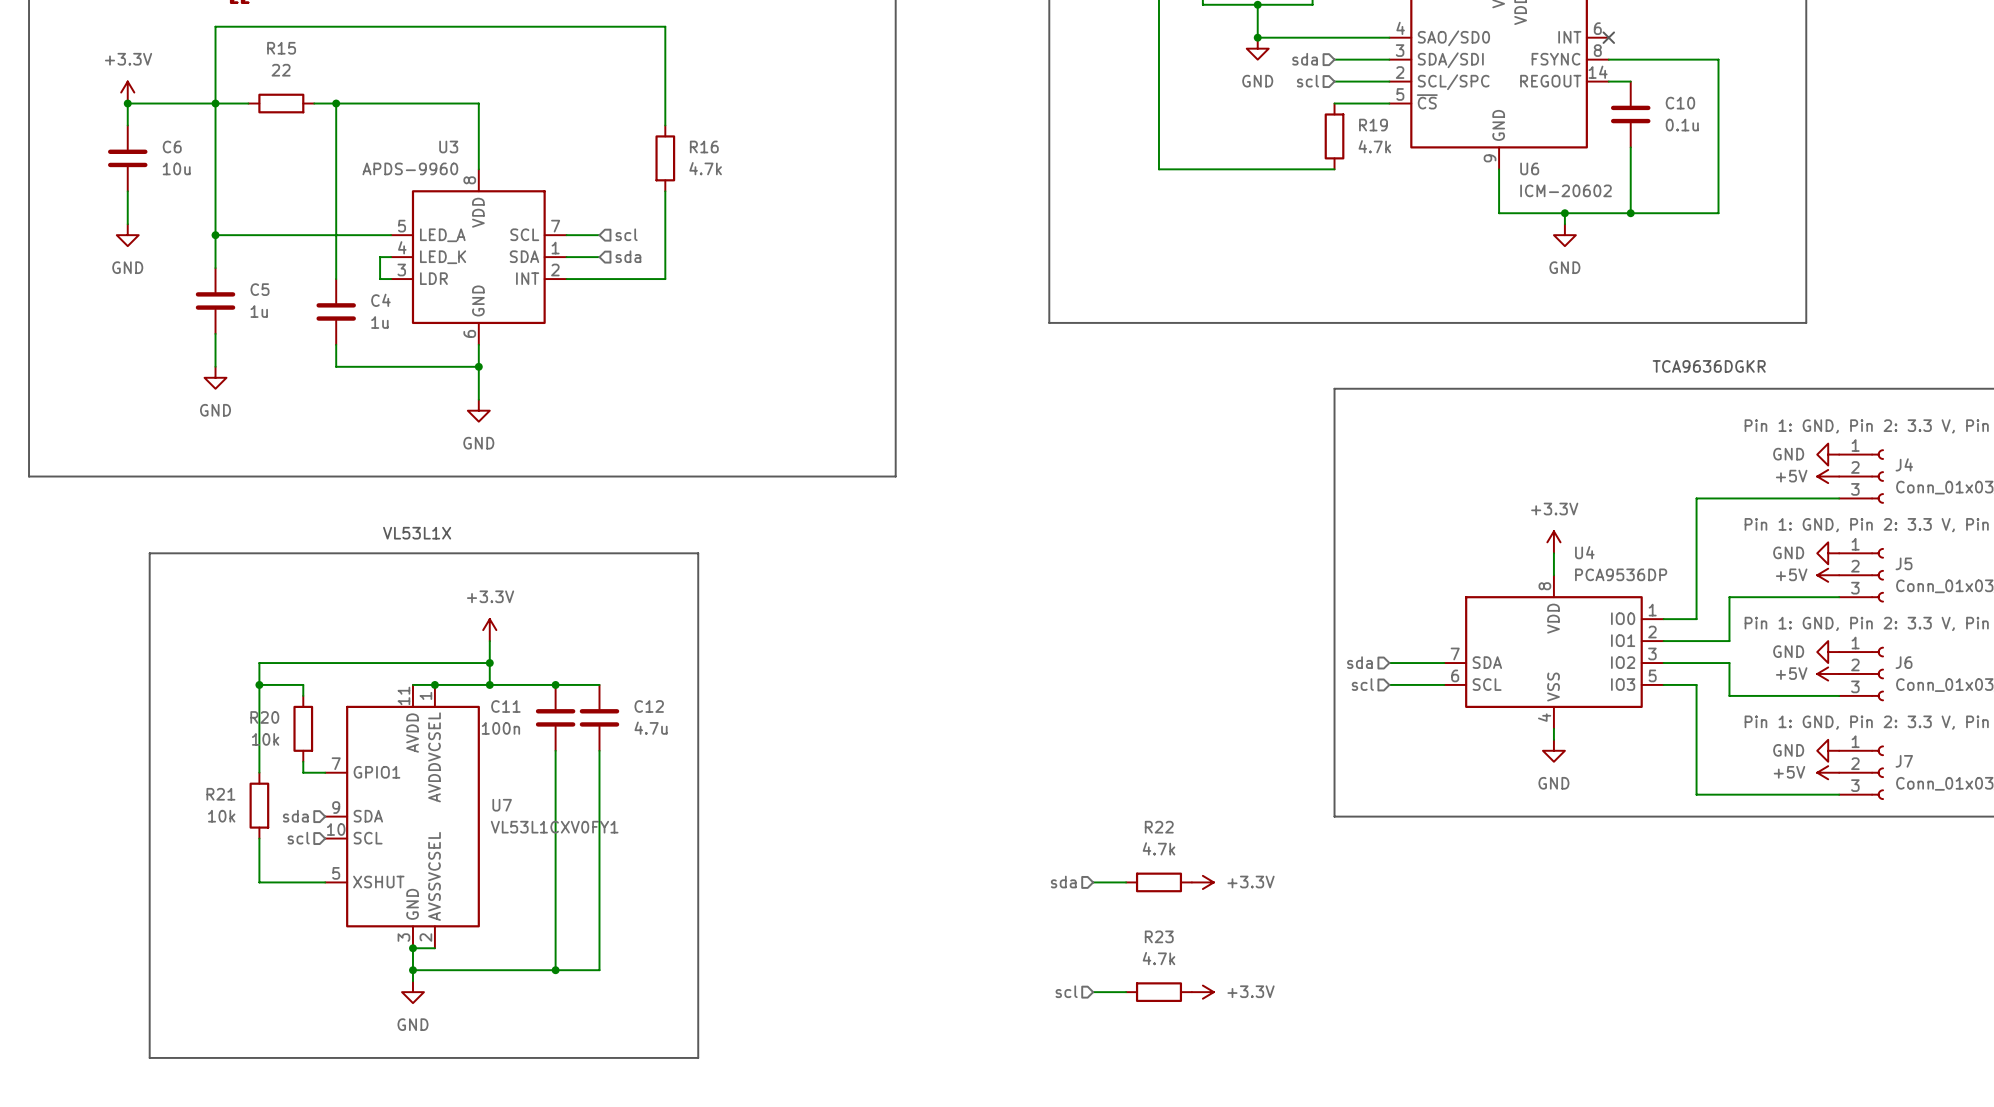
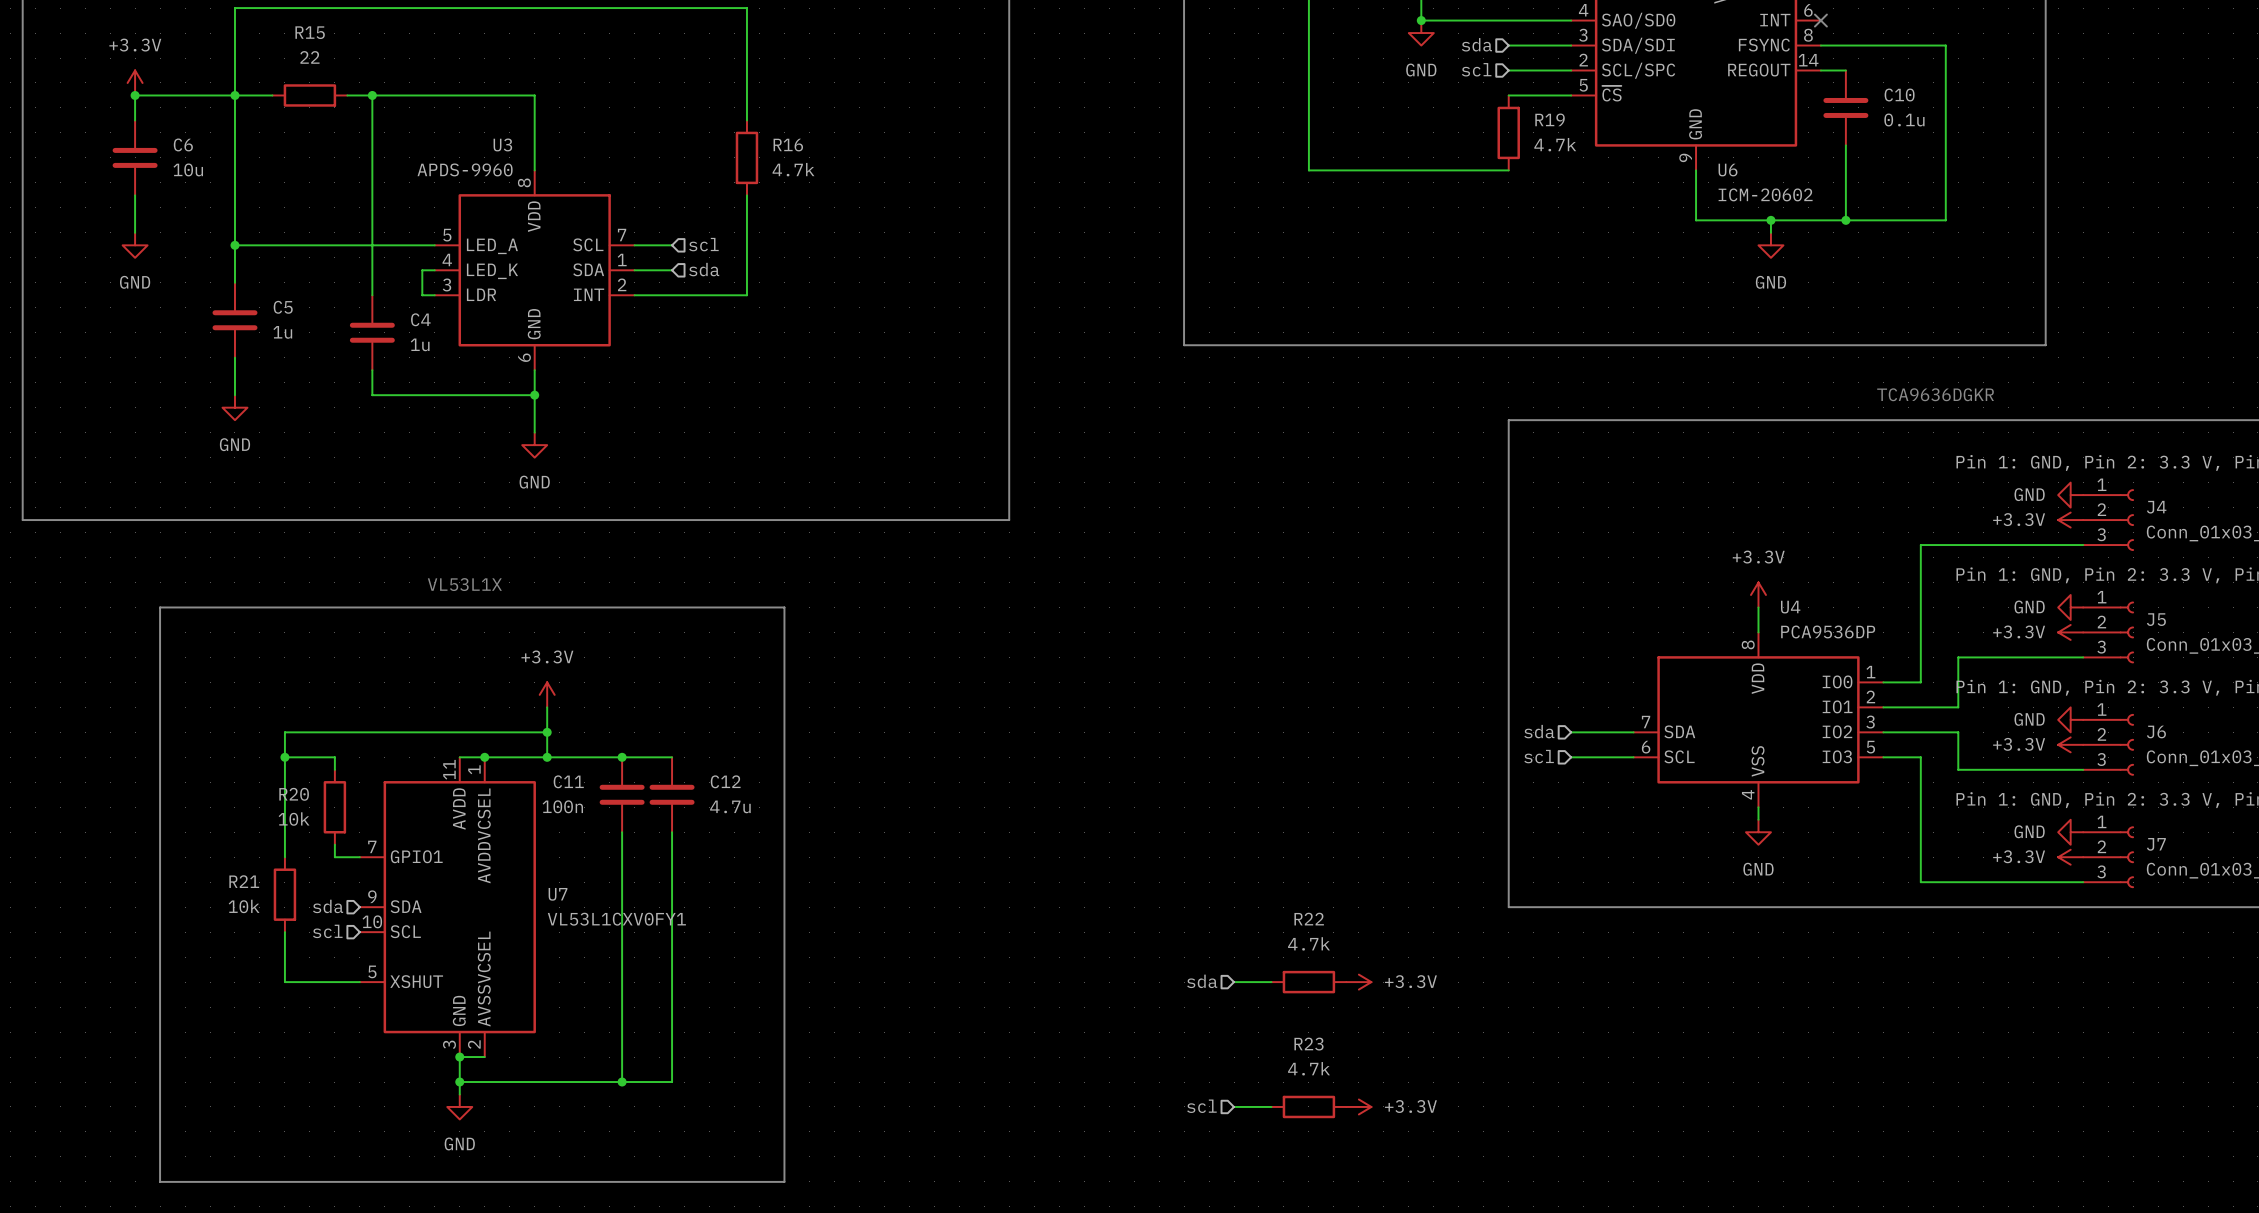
power symbol: +5V (1828, 476) -> +3.3V (2070, 520)
power symbol: +5V (1828, 575) -> +3.3V (2070, 632)
power symbol: +5V (1828, 673) -> +3.3V (2070, 744)
power symbol: +5V (1828, 772) -> +3.3V (2070, 857)

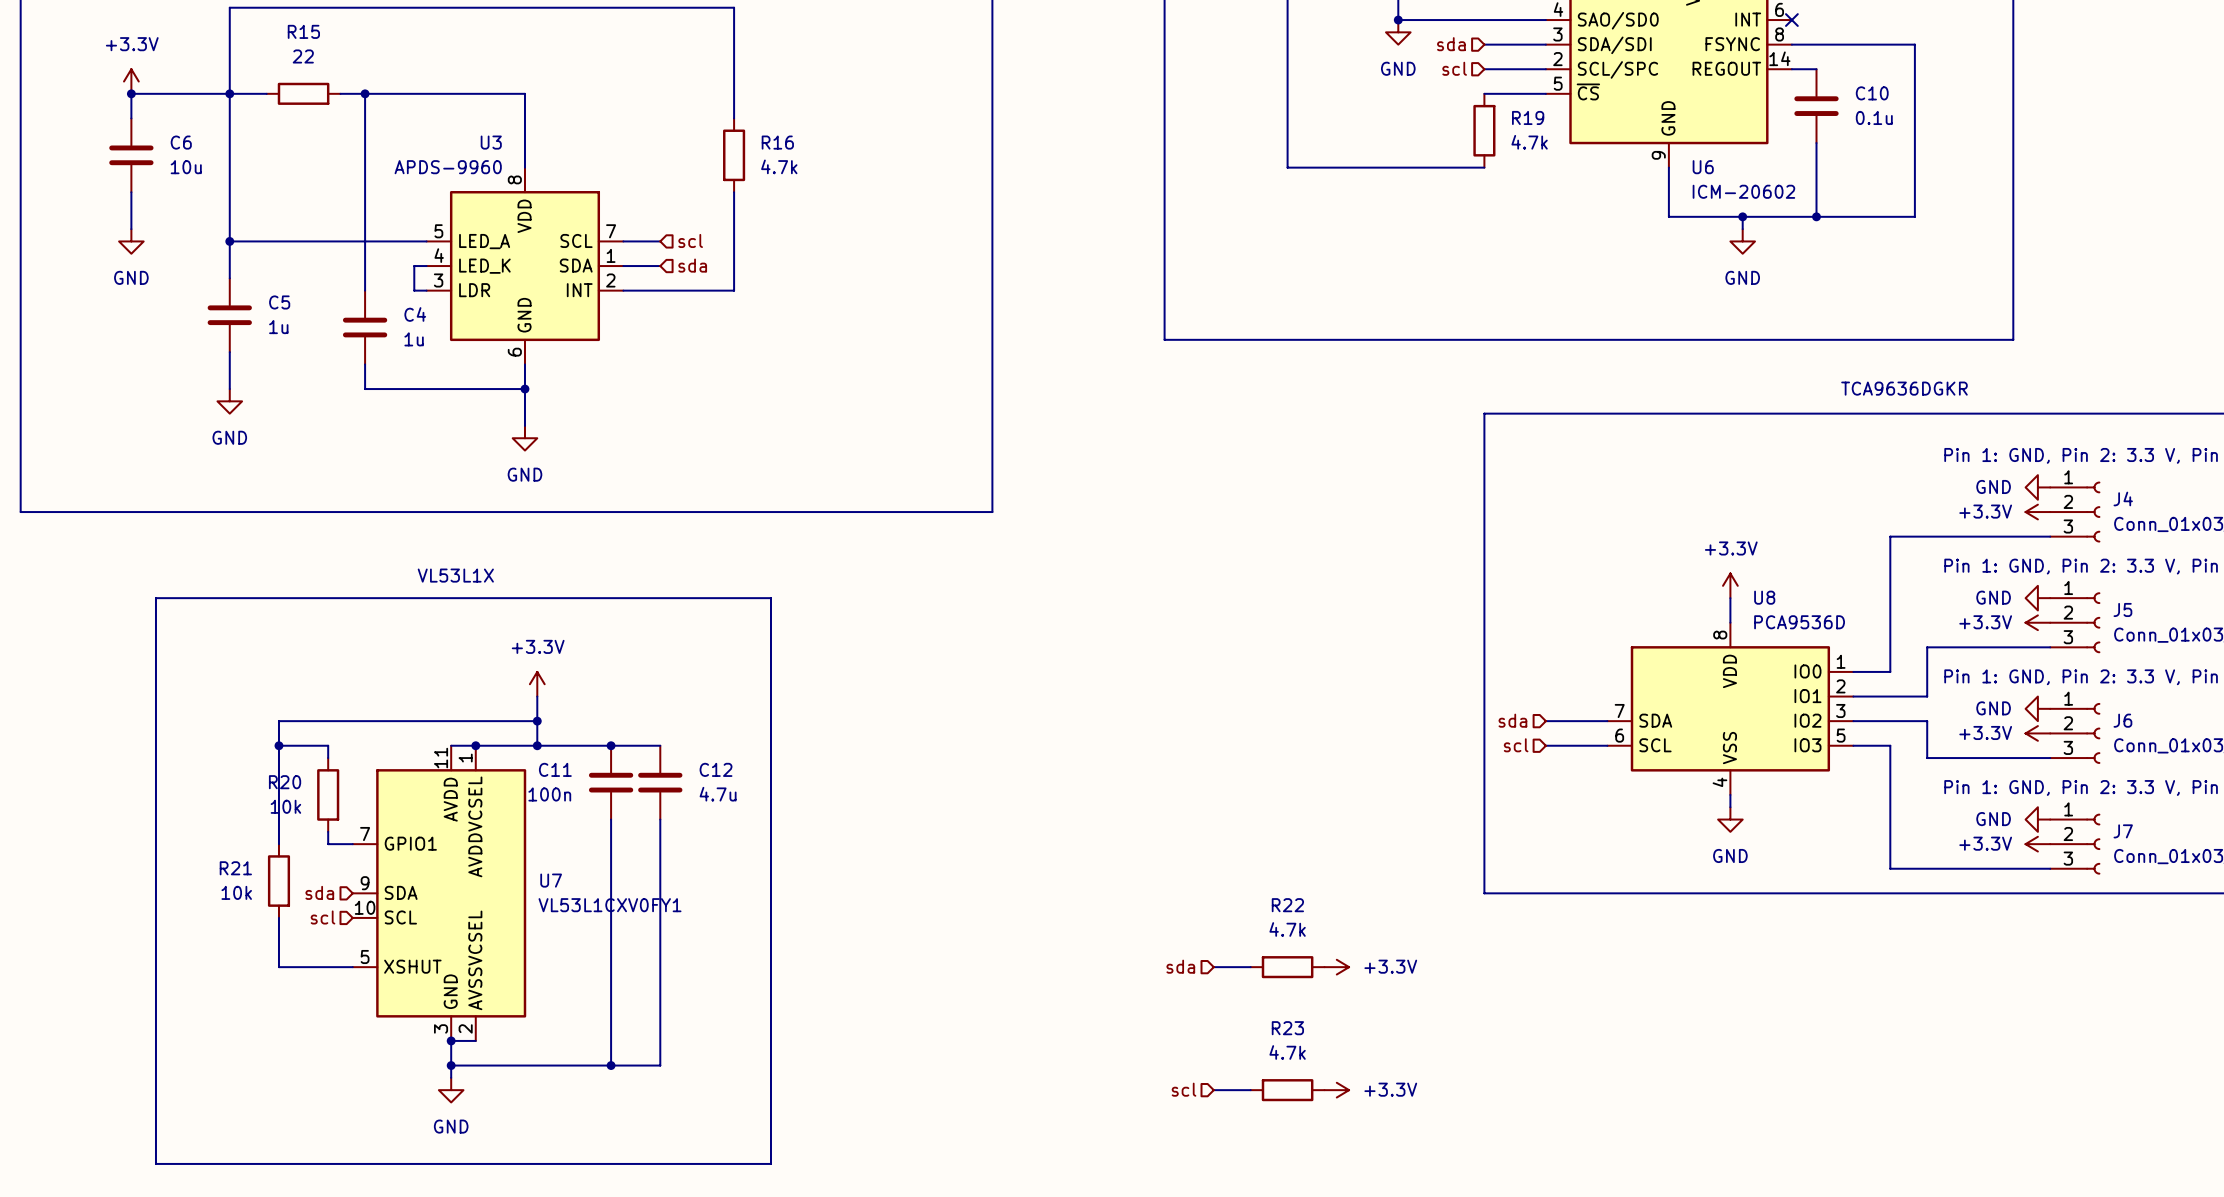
U4 name: U4 (1790, 607) -> U8 (1764, 597)
U4 value: PCA9536DP (1828, 631) -> PCA9536D (1799, 622)

